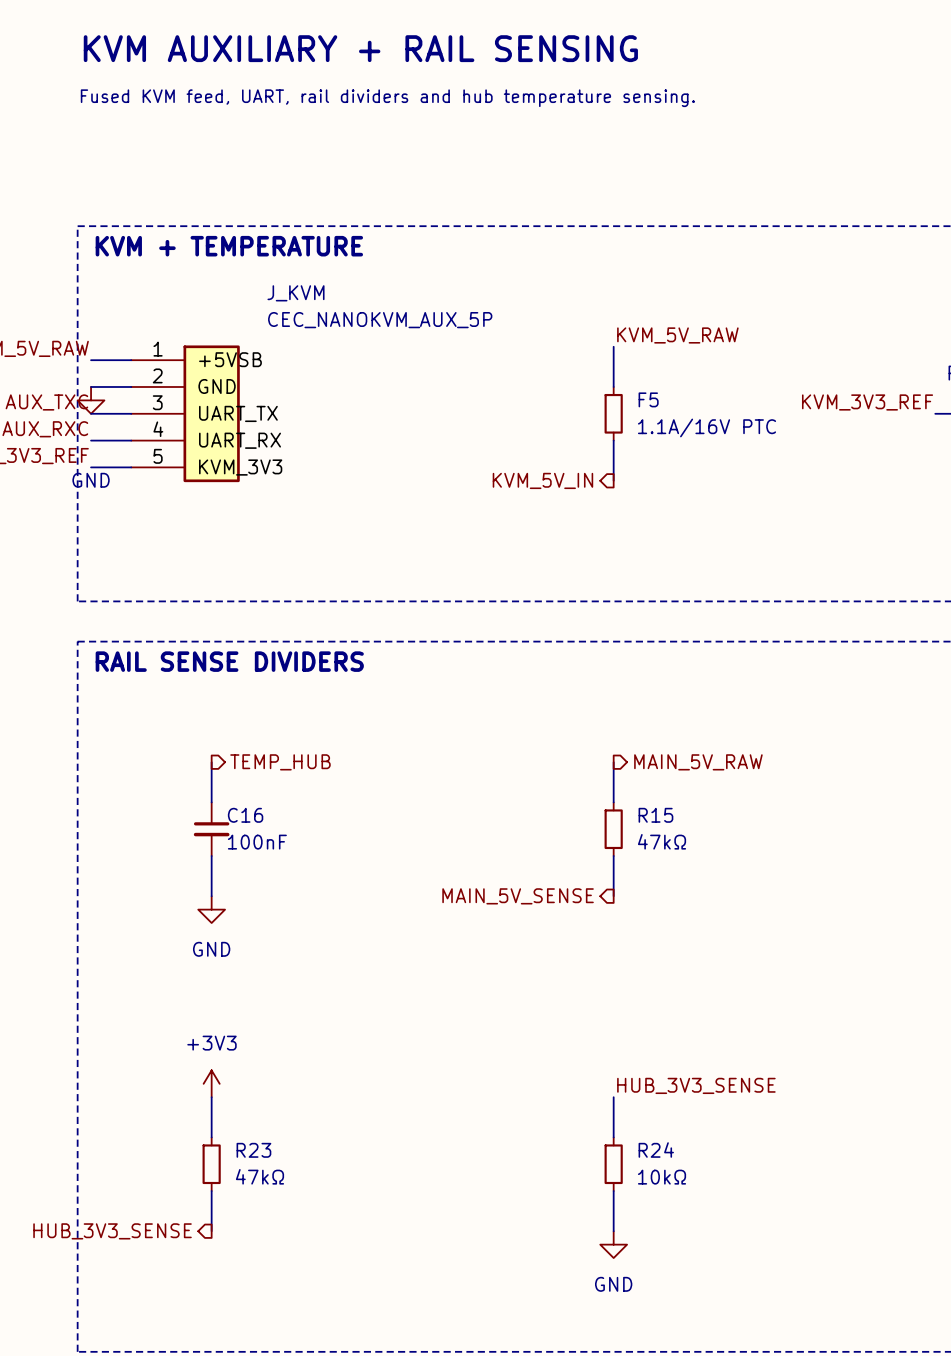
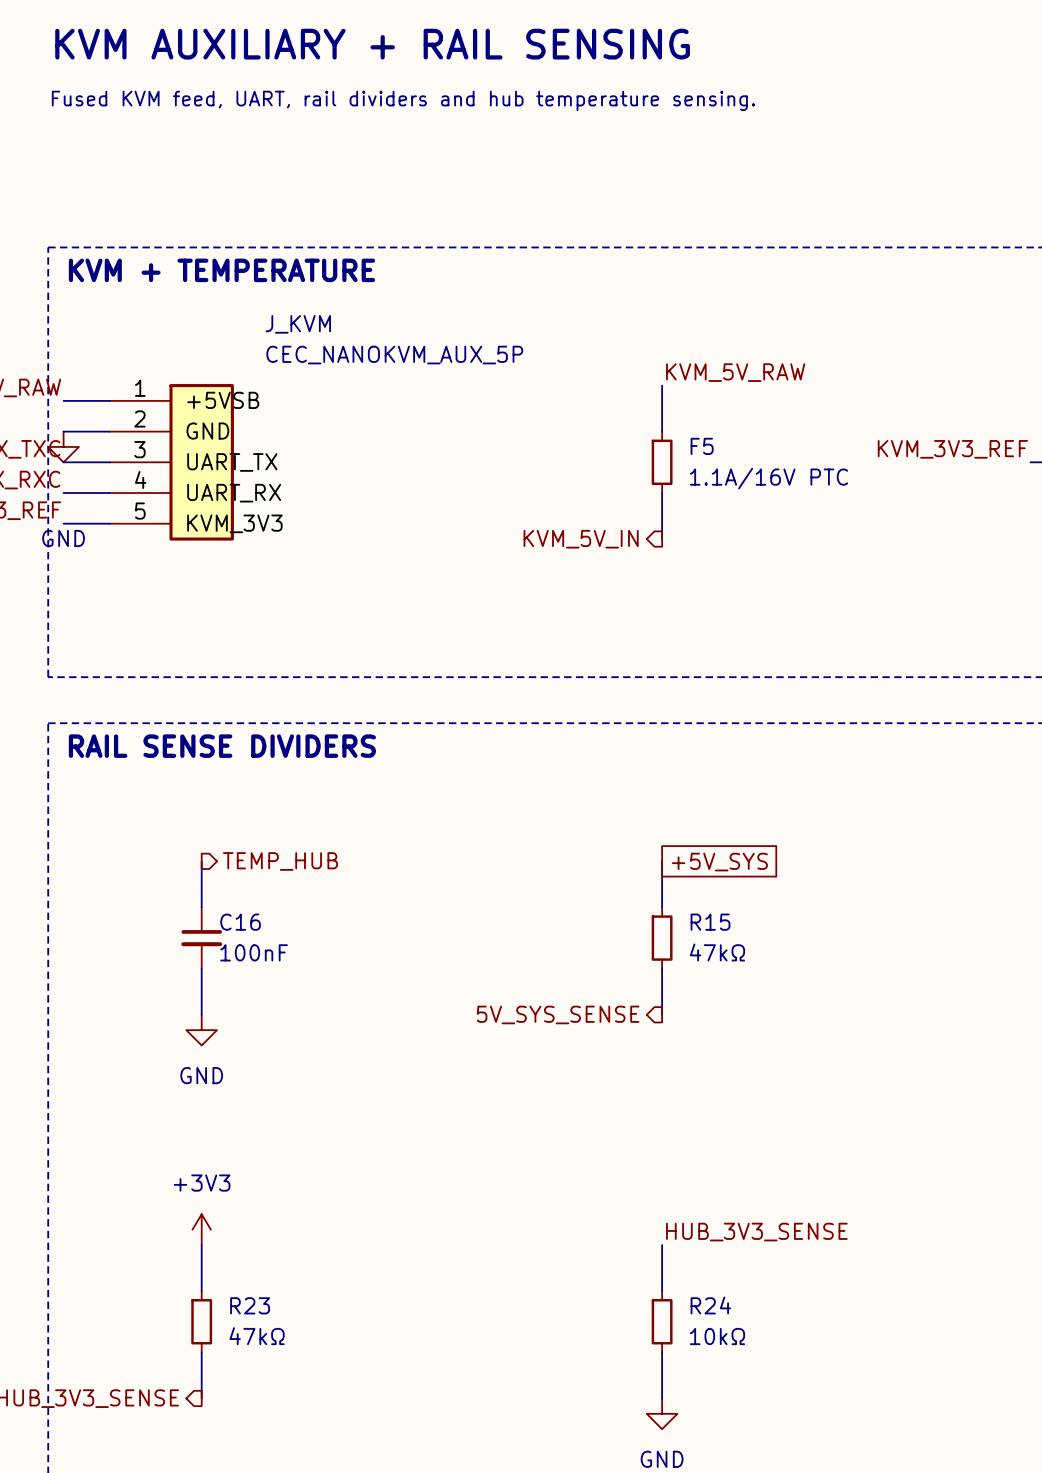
global label: none -> +5V_SYS (719, 862)
hierarchical label: MAIN_5V_RAW (698, 762) -> none
hierarchical label: MAIN_5V_SENSE (518, 896) -> 5V_SYS_SENSE (558, 1014)

